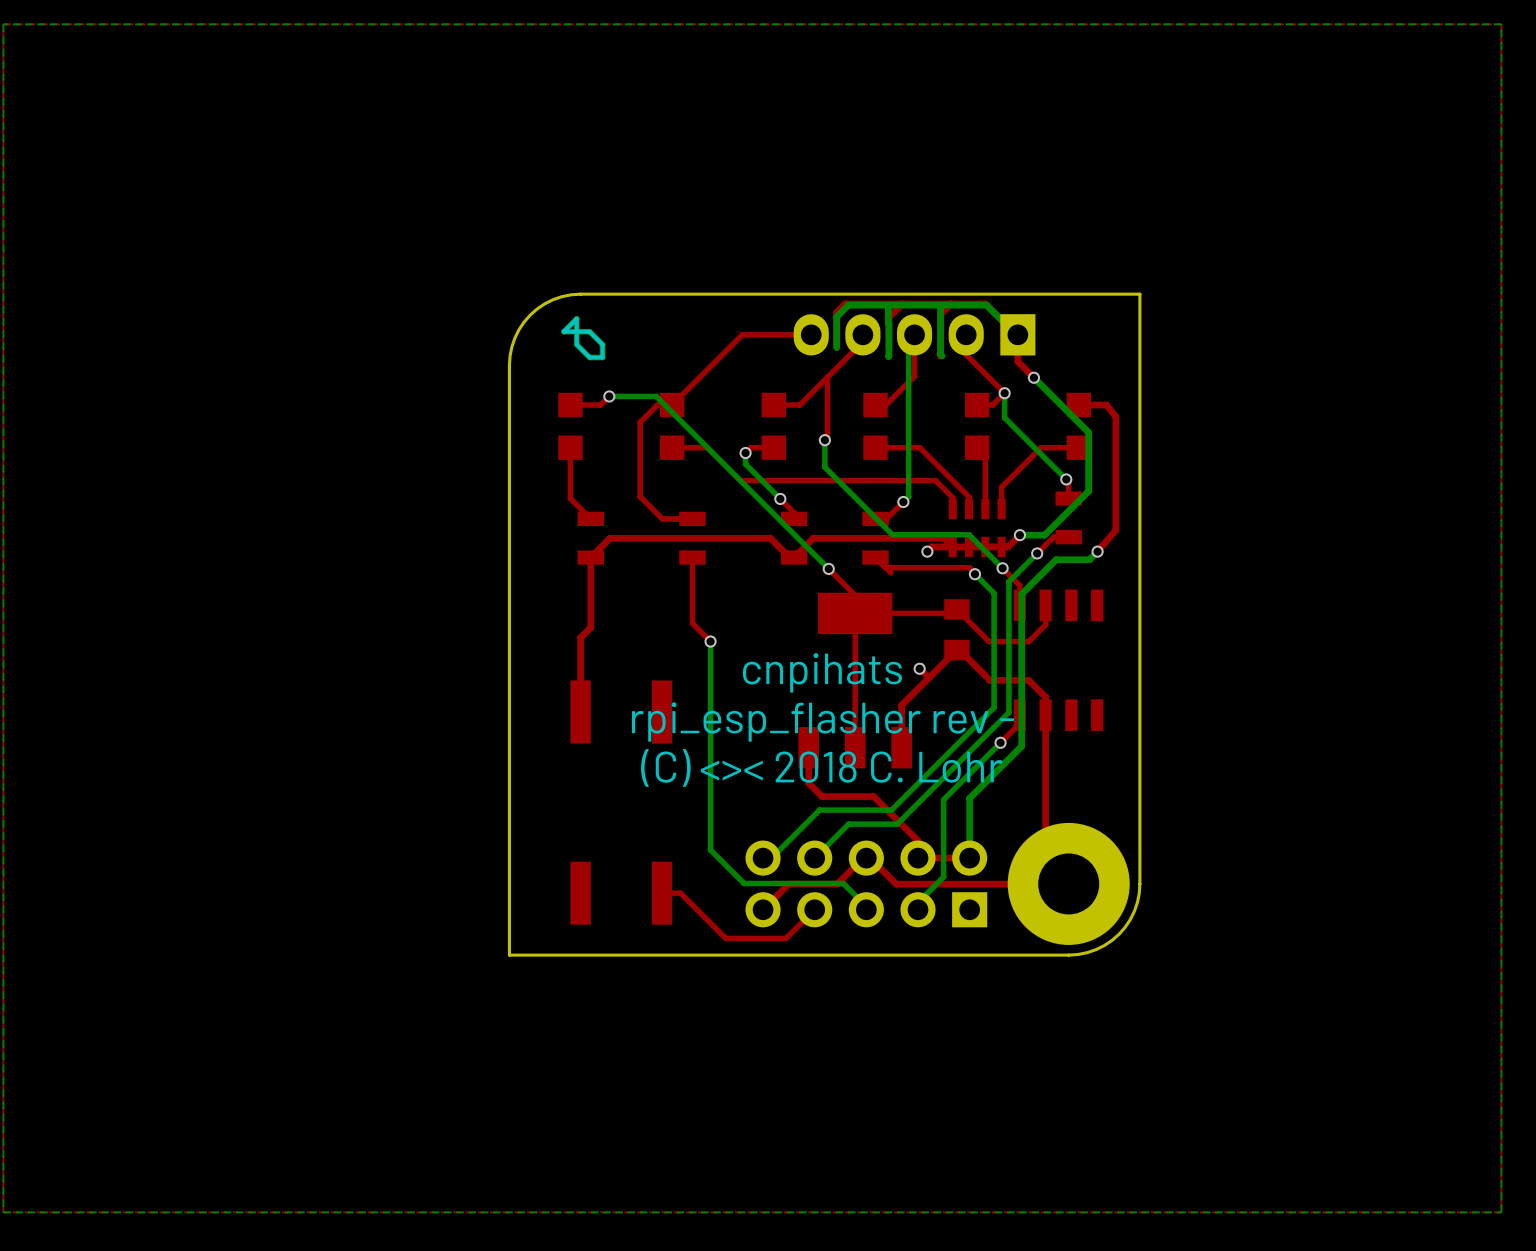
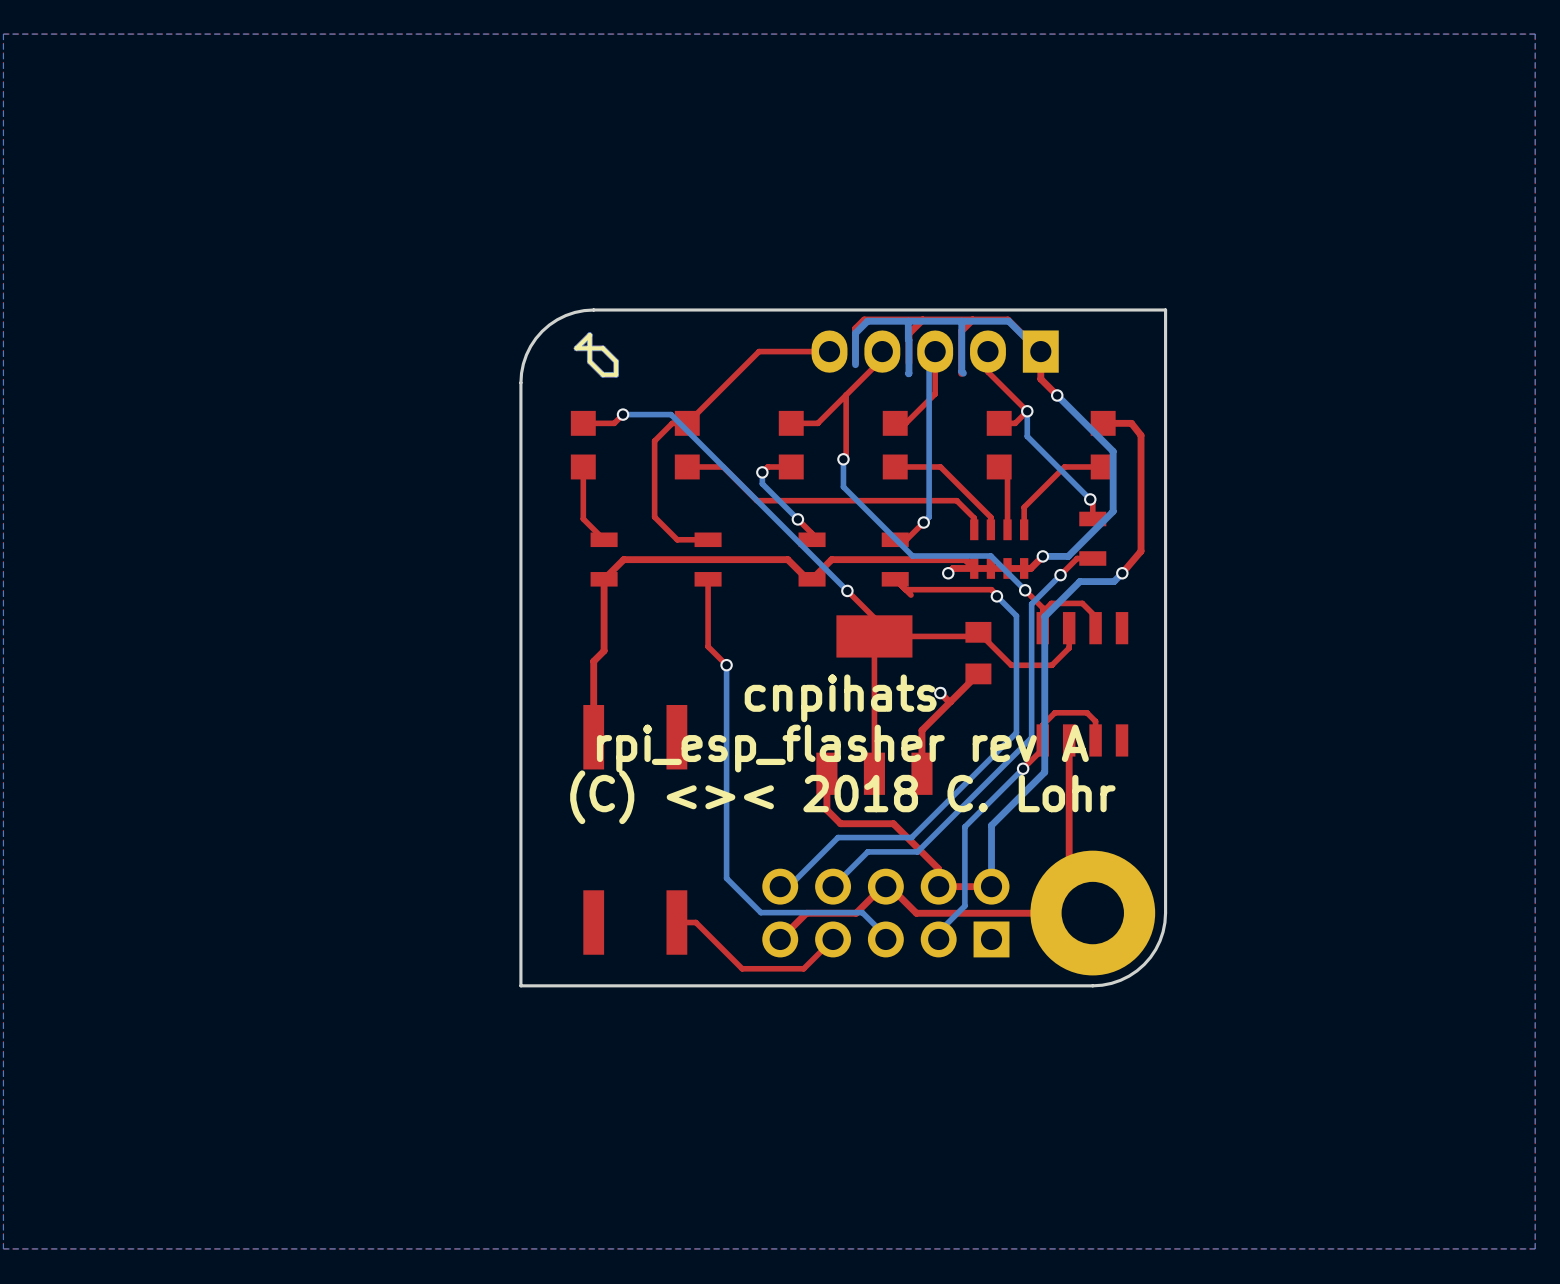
top track: none -> (1042, 612) (1051, 603) (1082, 603) (1095, 616) (1095, 628)
top track: (959, 650) (990, 680) (1028, 680) (1045, 697) (1045, 715) -> none
top track: none -> (1095, 740) (1095, 721) (1086, 712) (1054, 712) (1042, 724) (1042, 740)
text: rpi_esp_flasher rev - (823, 721) -> rpi_esp_flasher rev A (842, 748)

